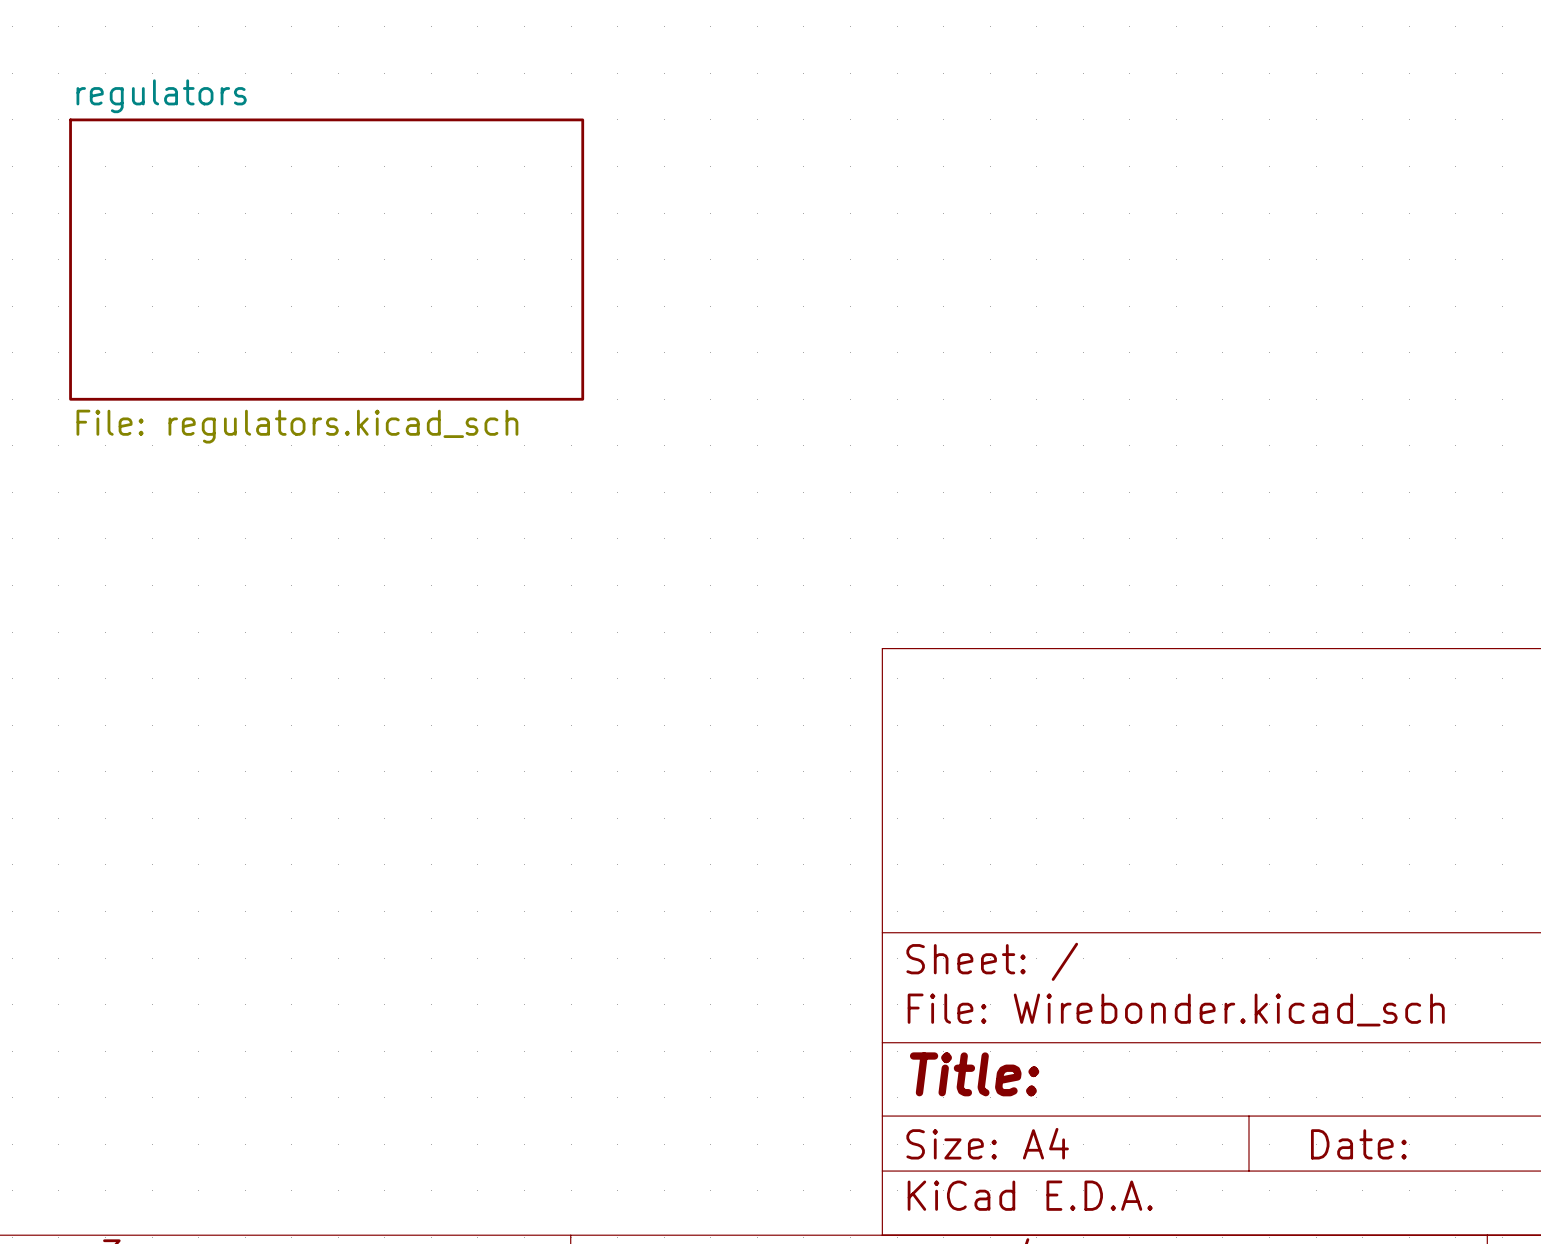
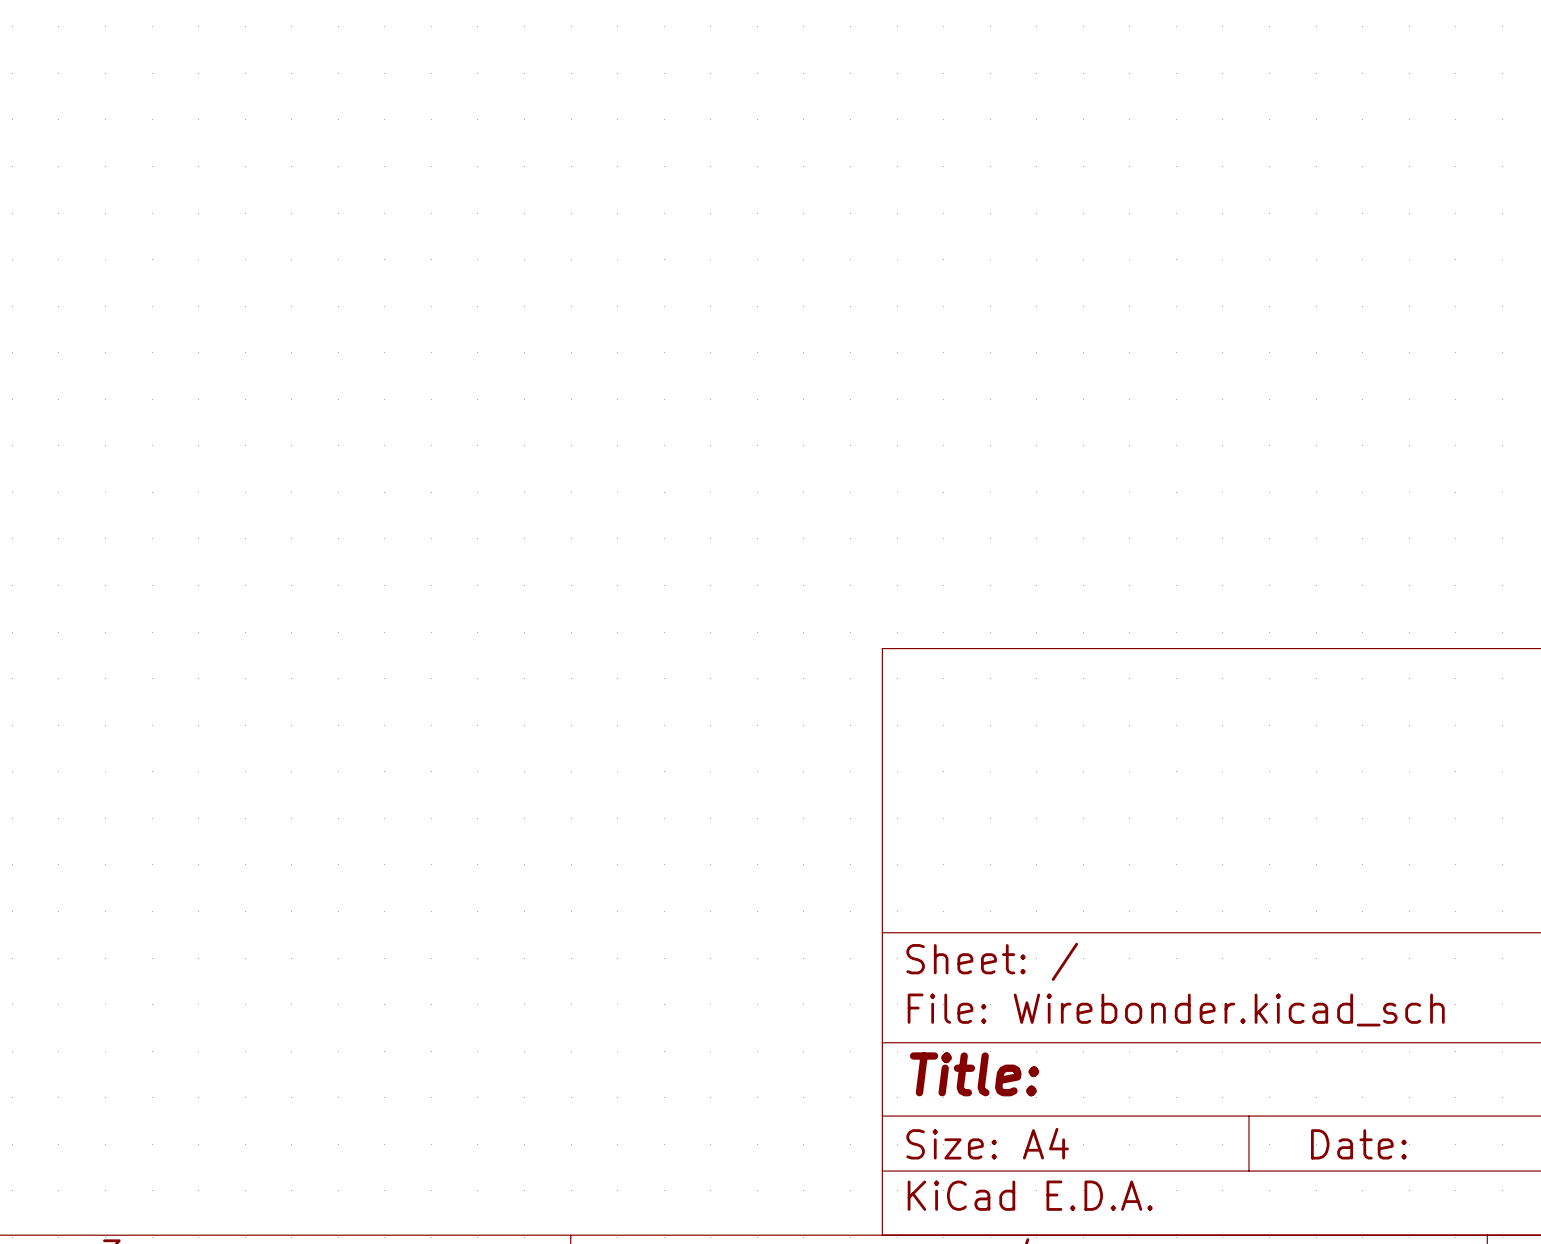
sheet regulators: File: regulators.kicad_sch (326, 259) -> none

